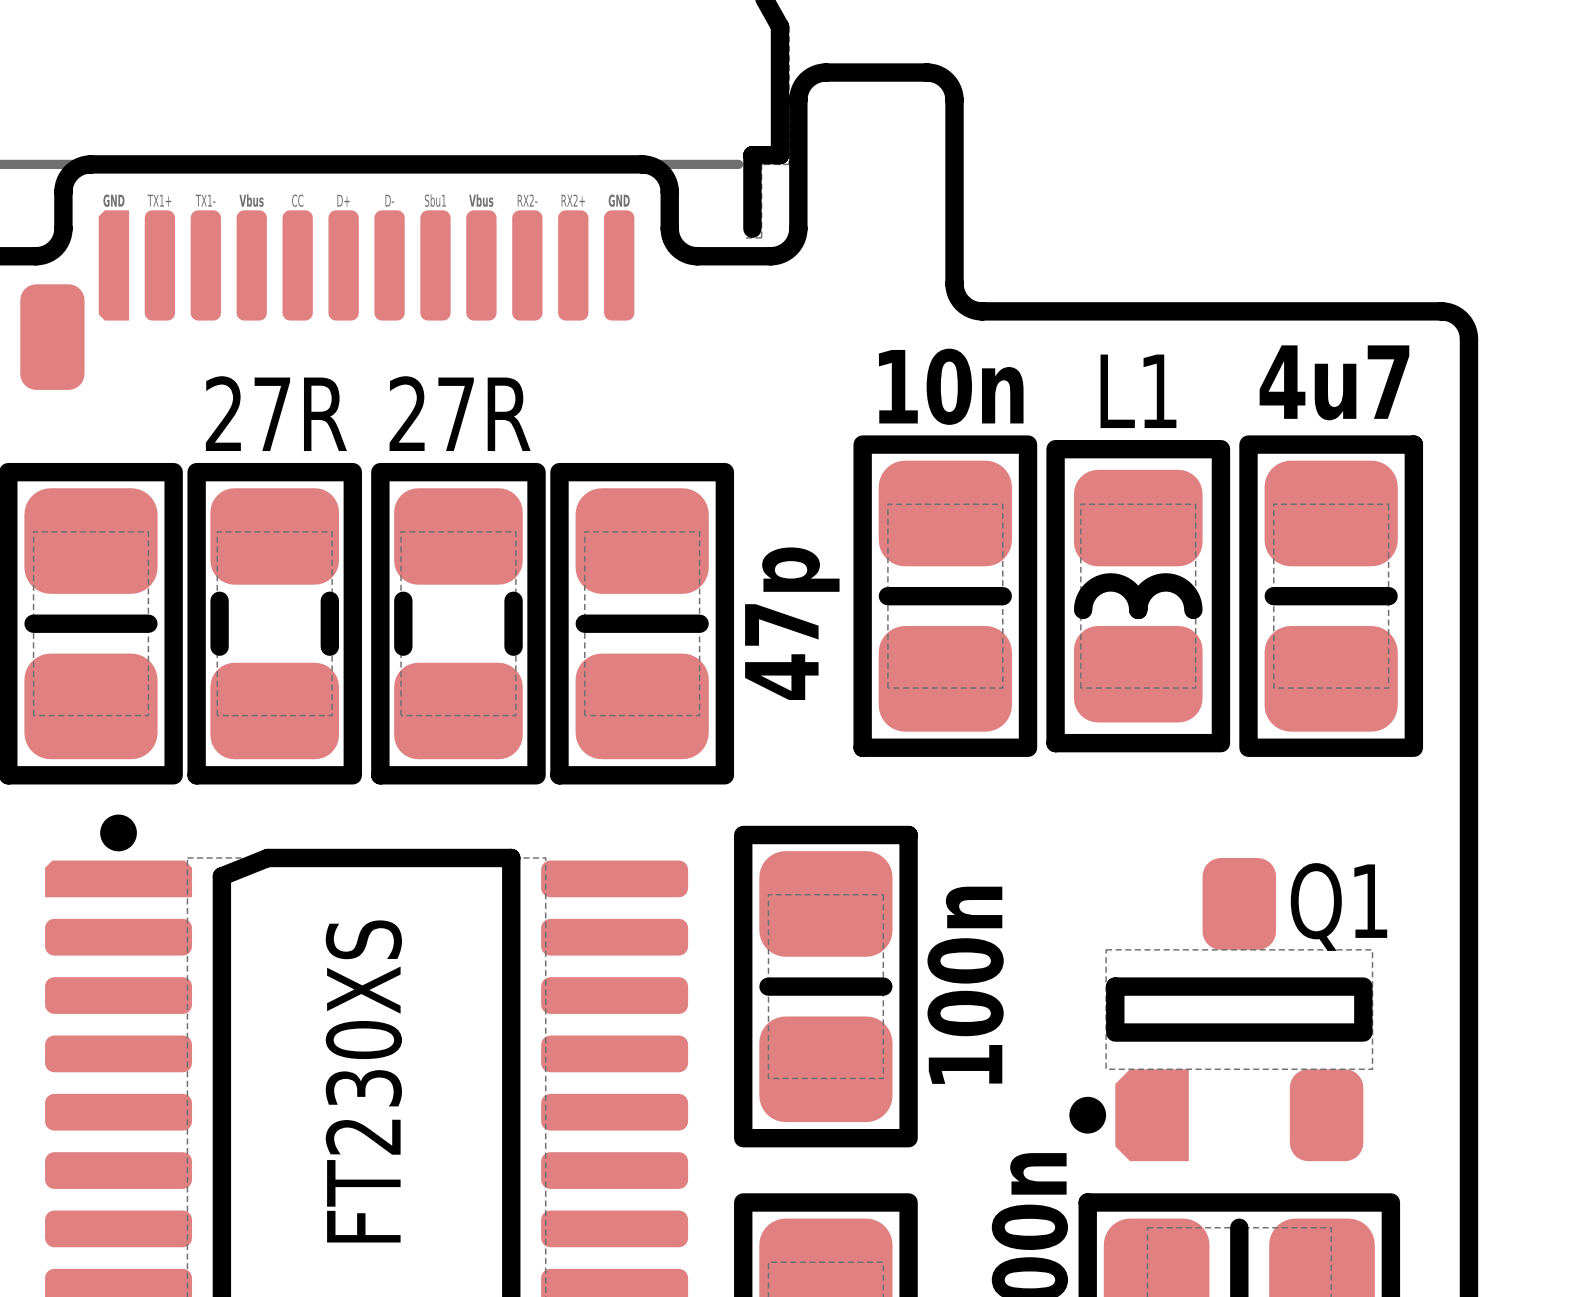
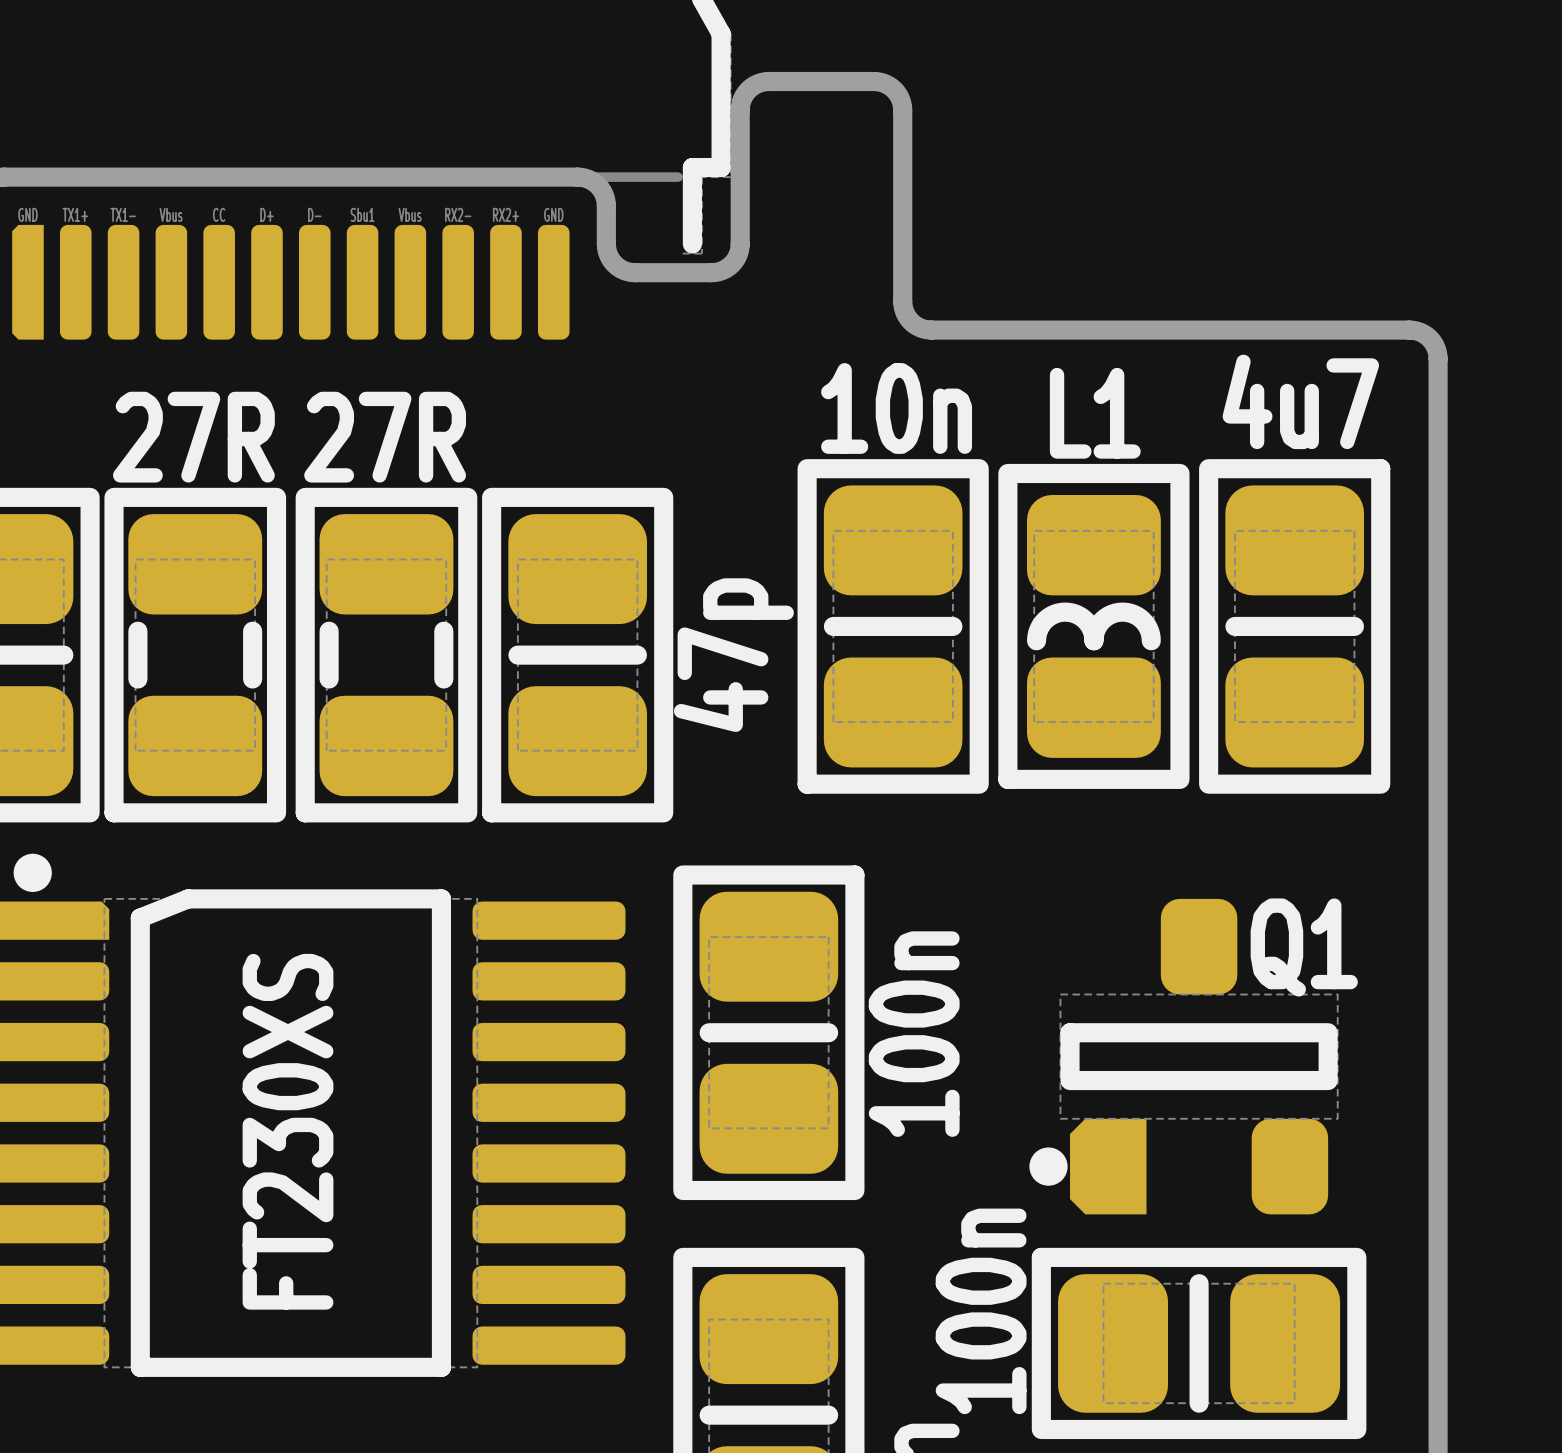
Q1 footprint: [1069, 857, 1373, 1162] -> [1029, 898, 1339, 1215]

